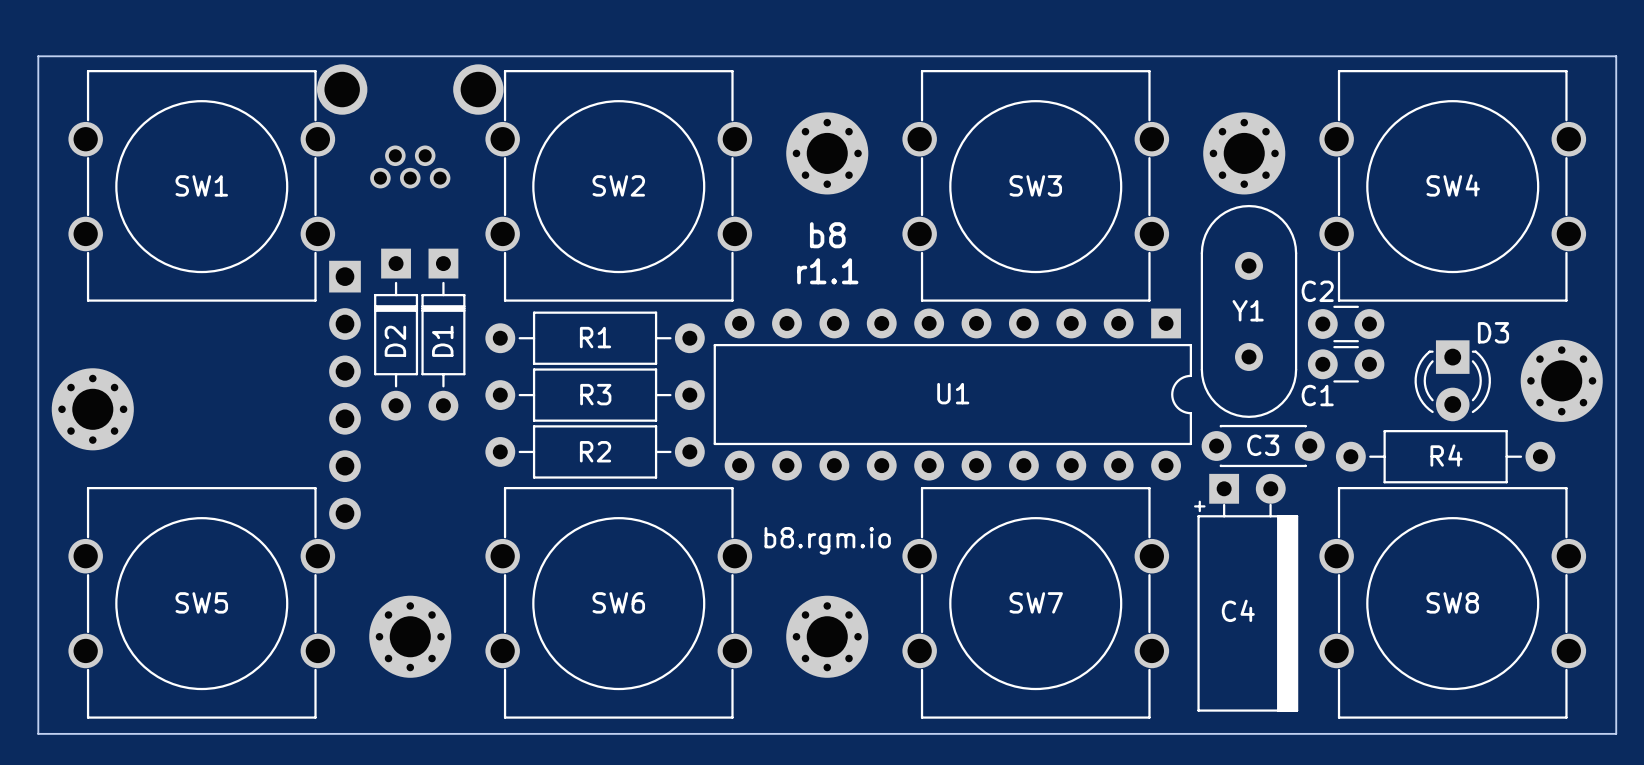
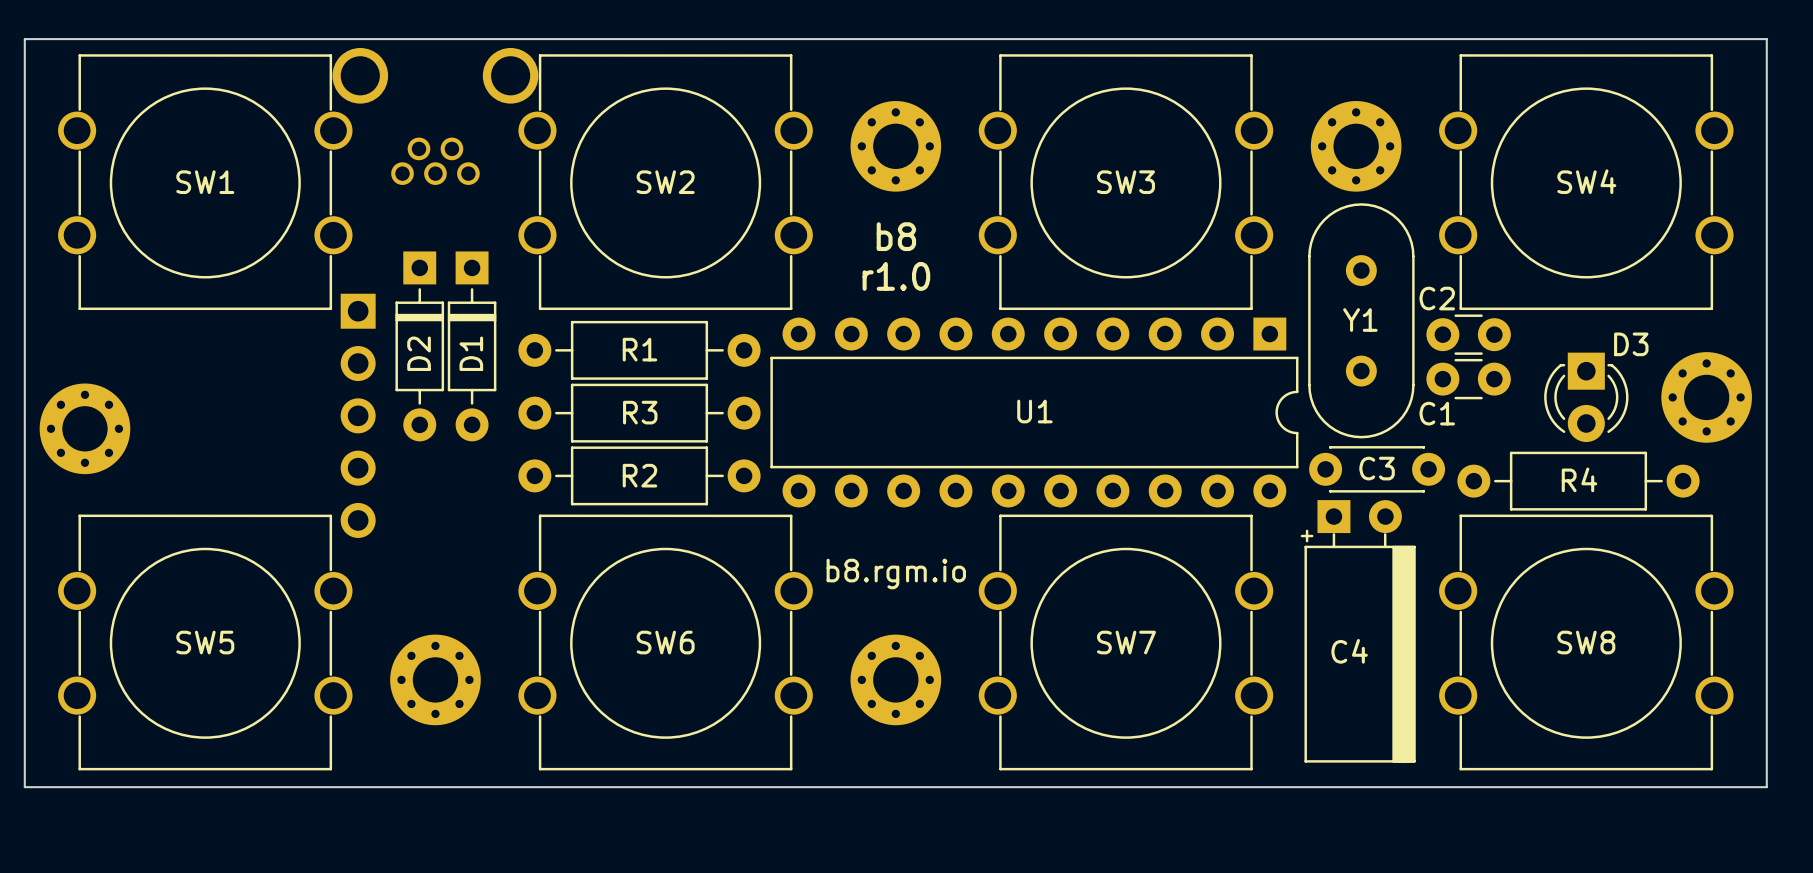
part footprint: [329, 260, 361, 530] -> [340, 293, 376, 538]
text: r1.1 (827, 271) -> r1.0 (896, 276)

